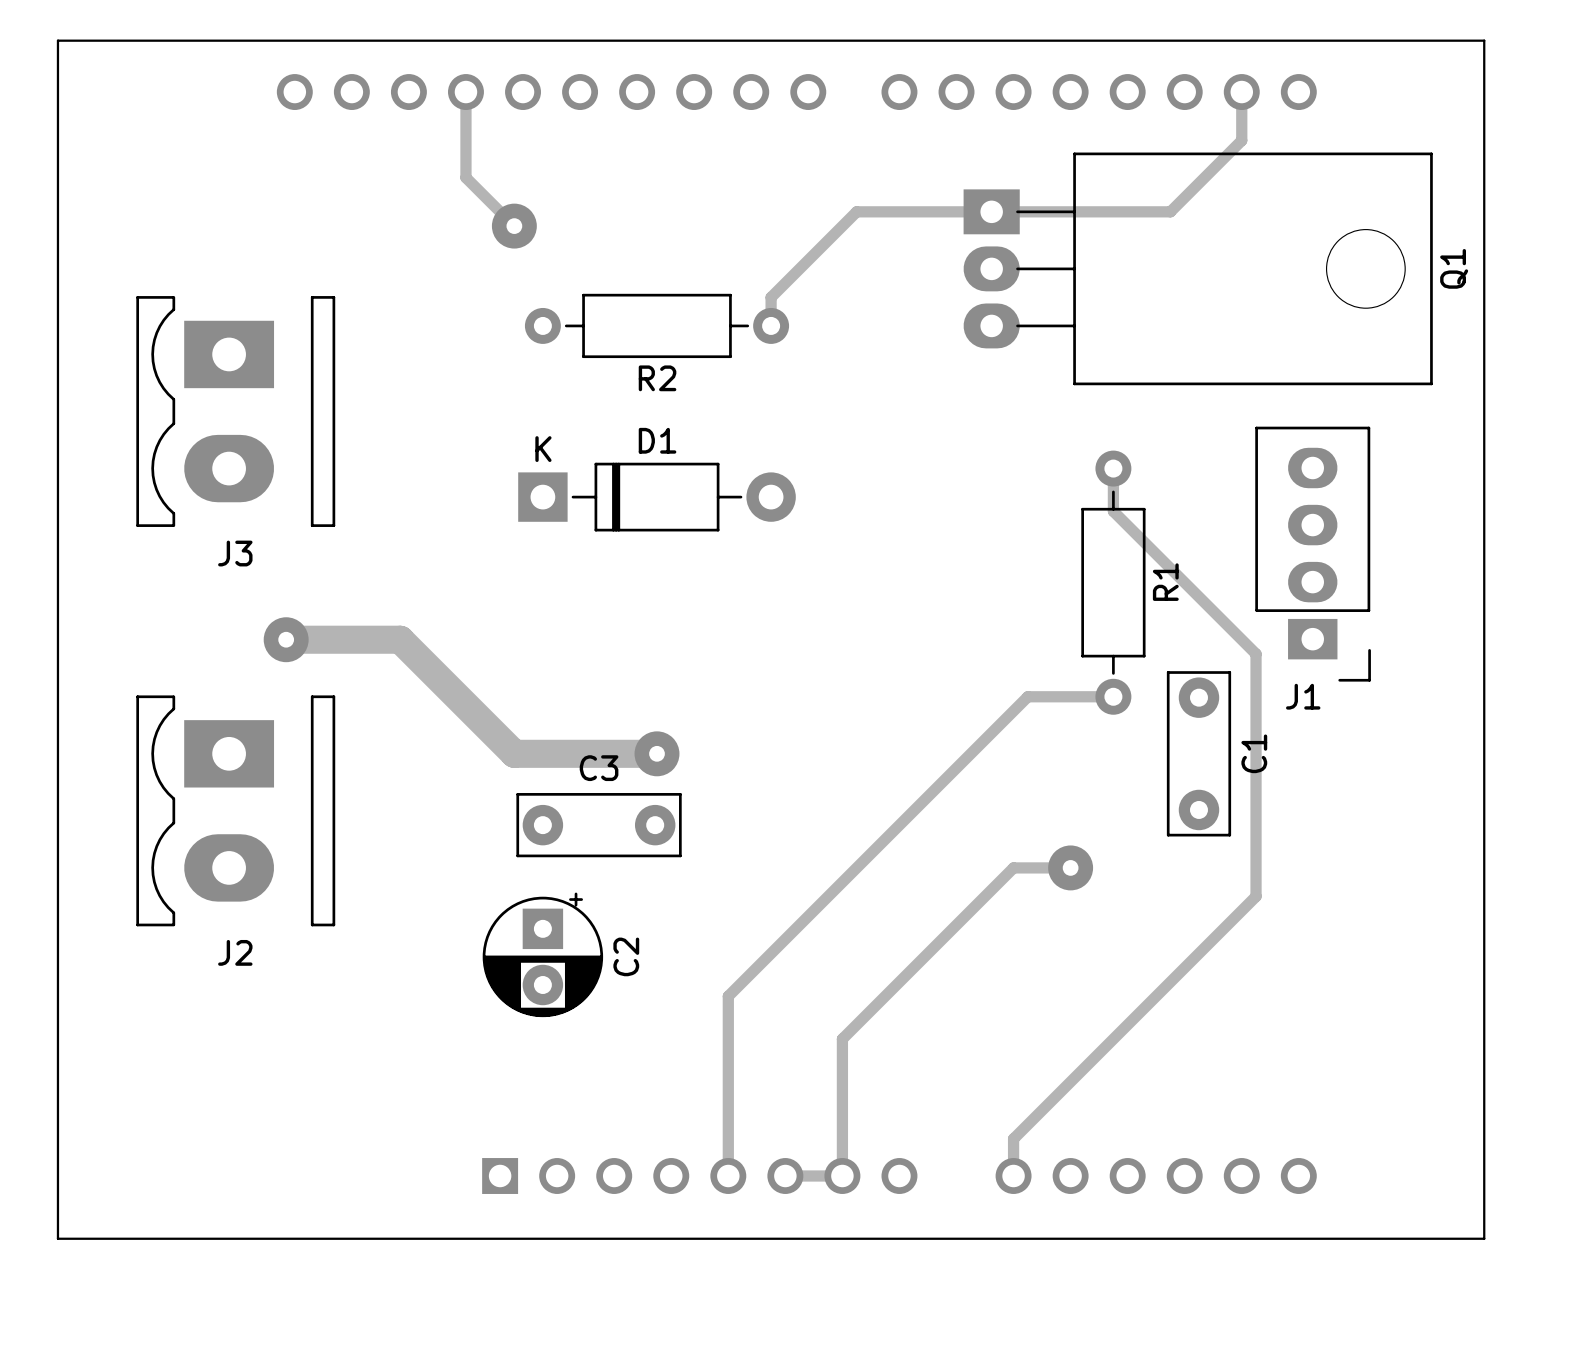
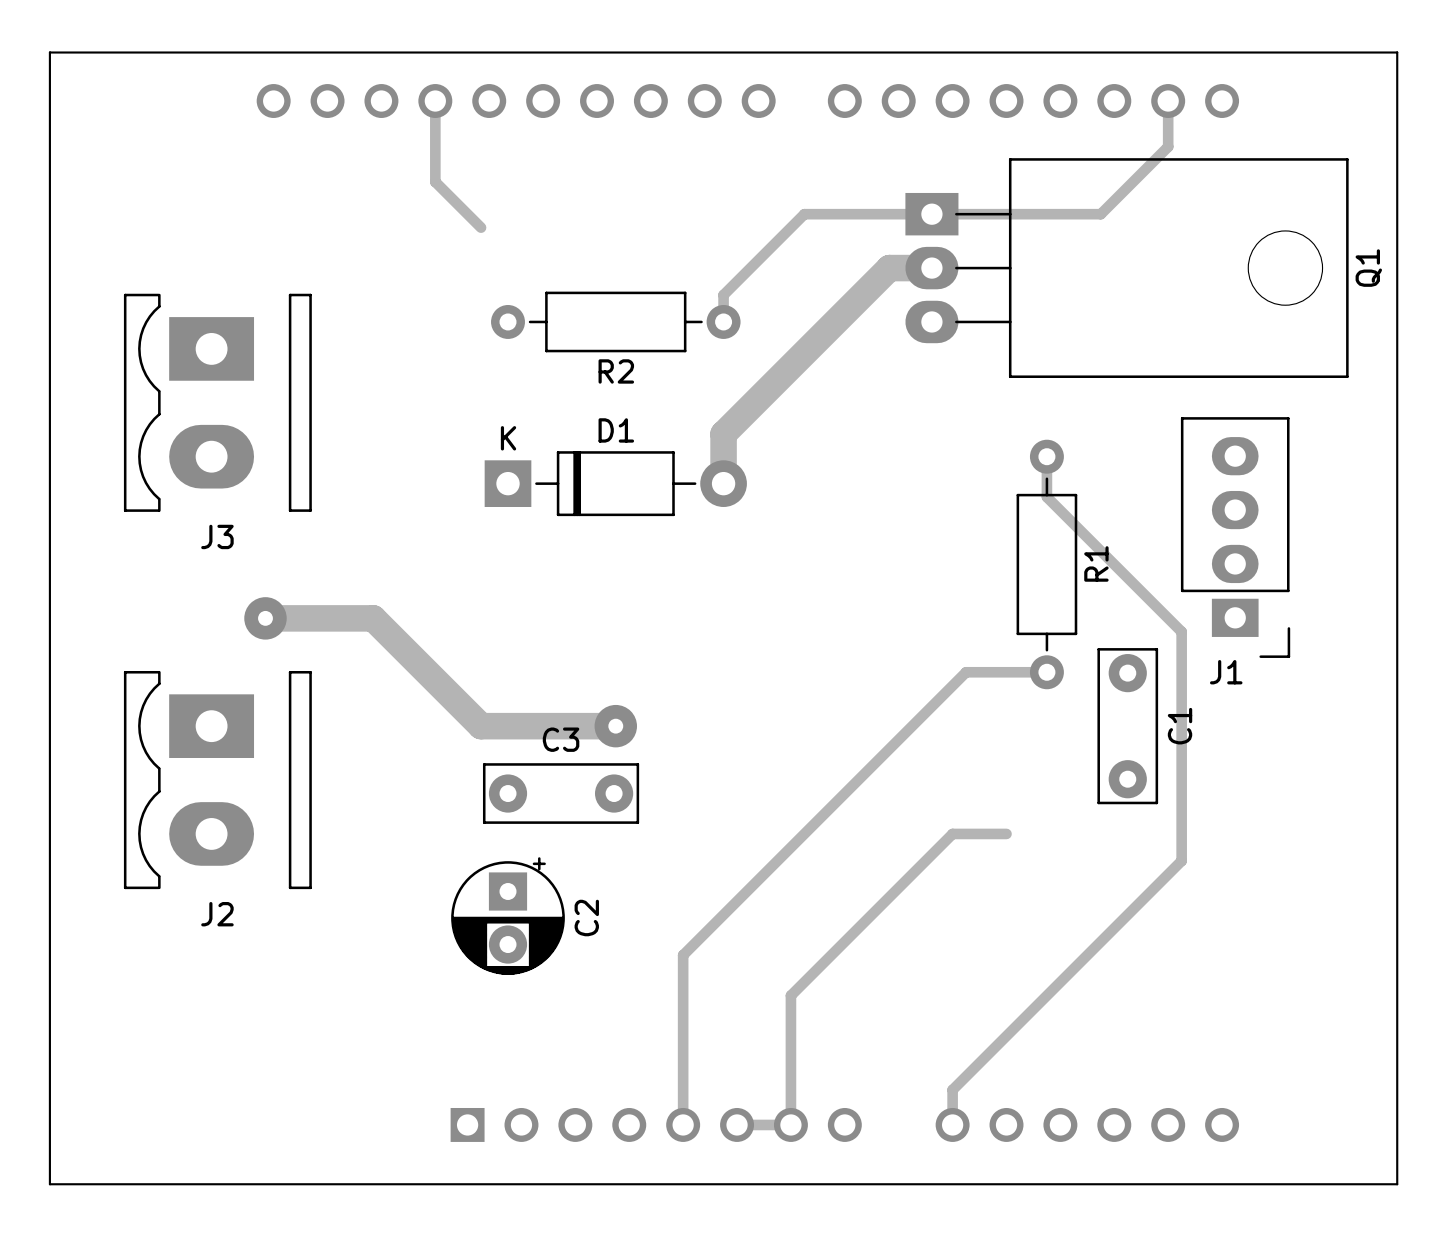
via: (514, 226) -> none
track: none -> (931, 268) (889, 268) (723, 434) (723, 483)
via: (1070, 867) -> none

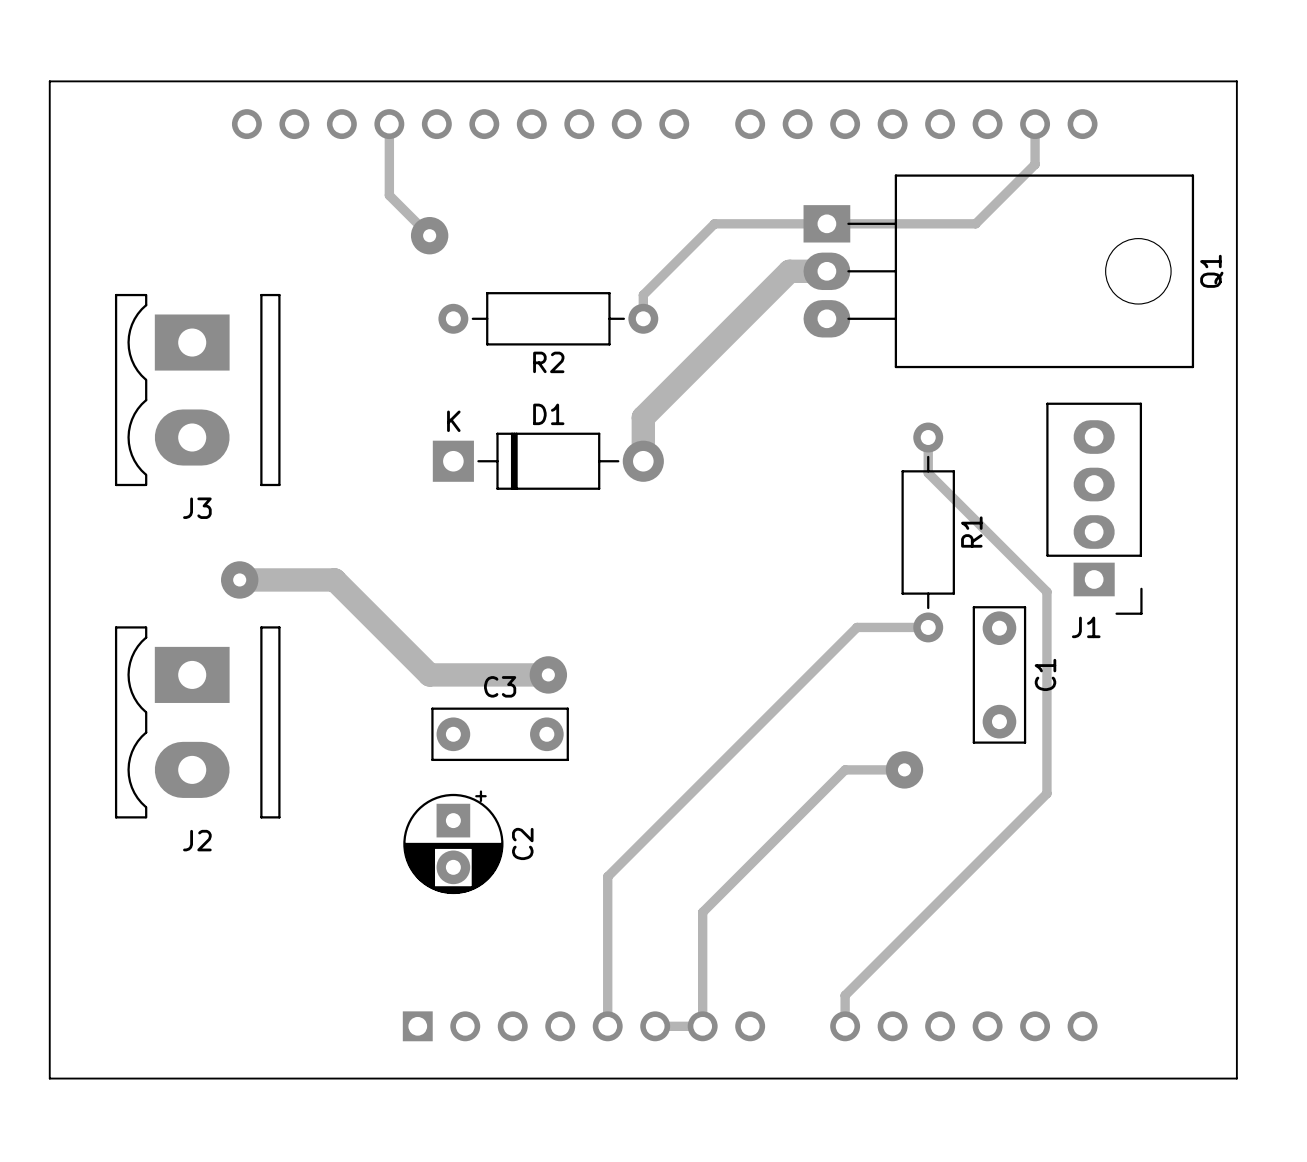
via: none -> (429, 235)
via: none -> (904, 769)

